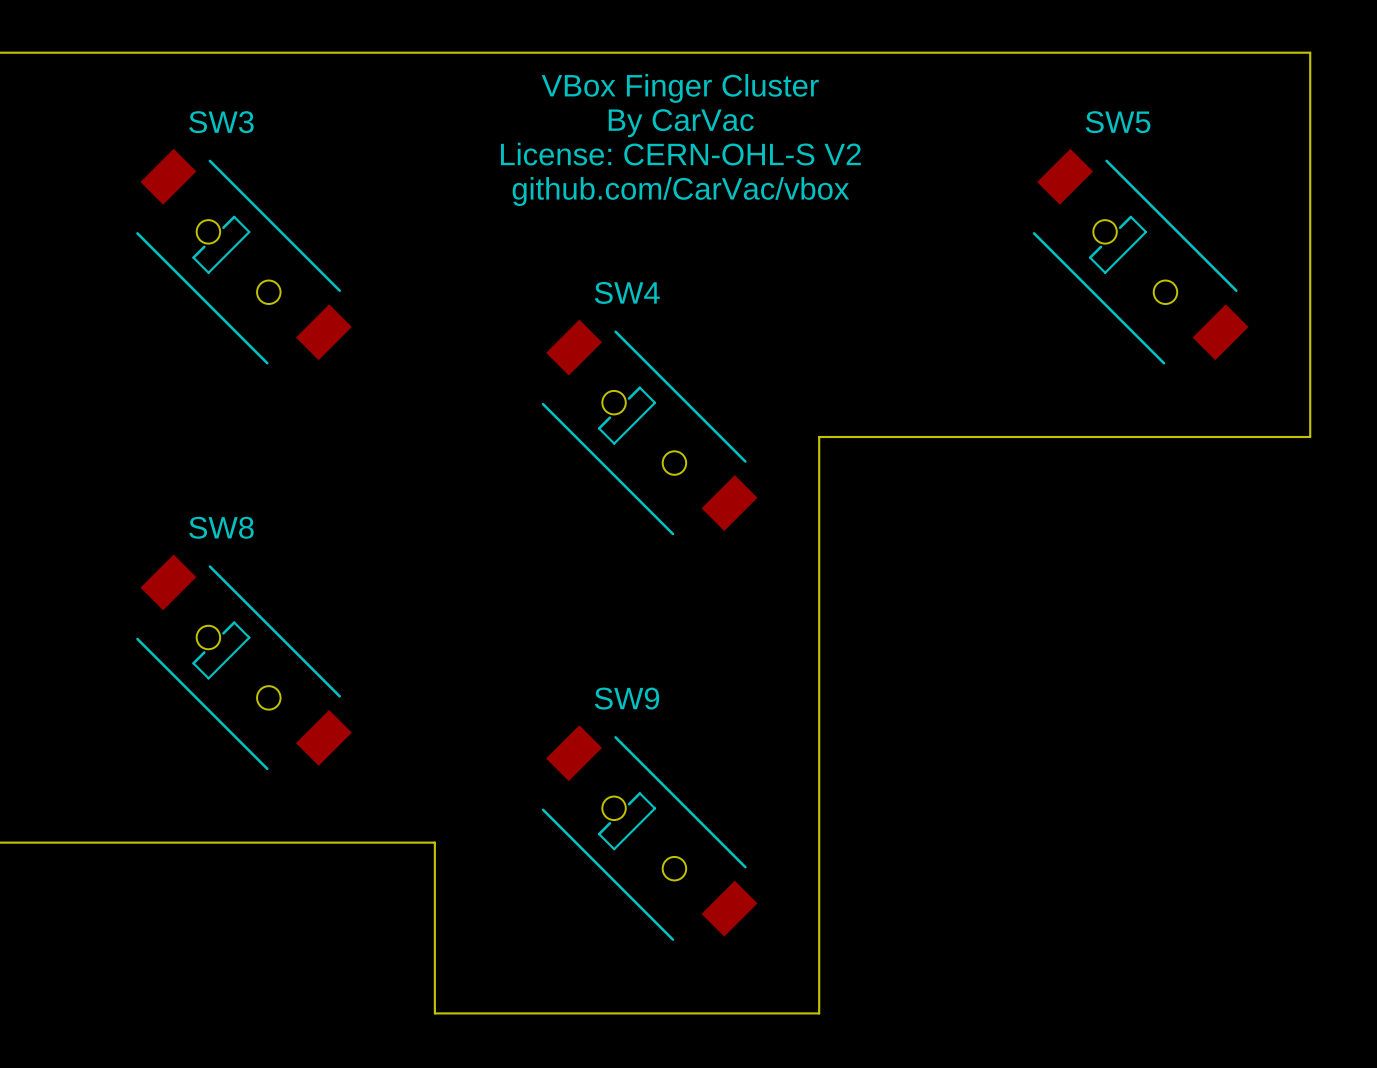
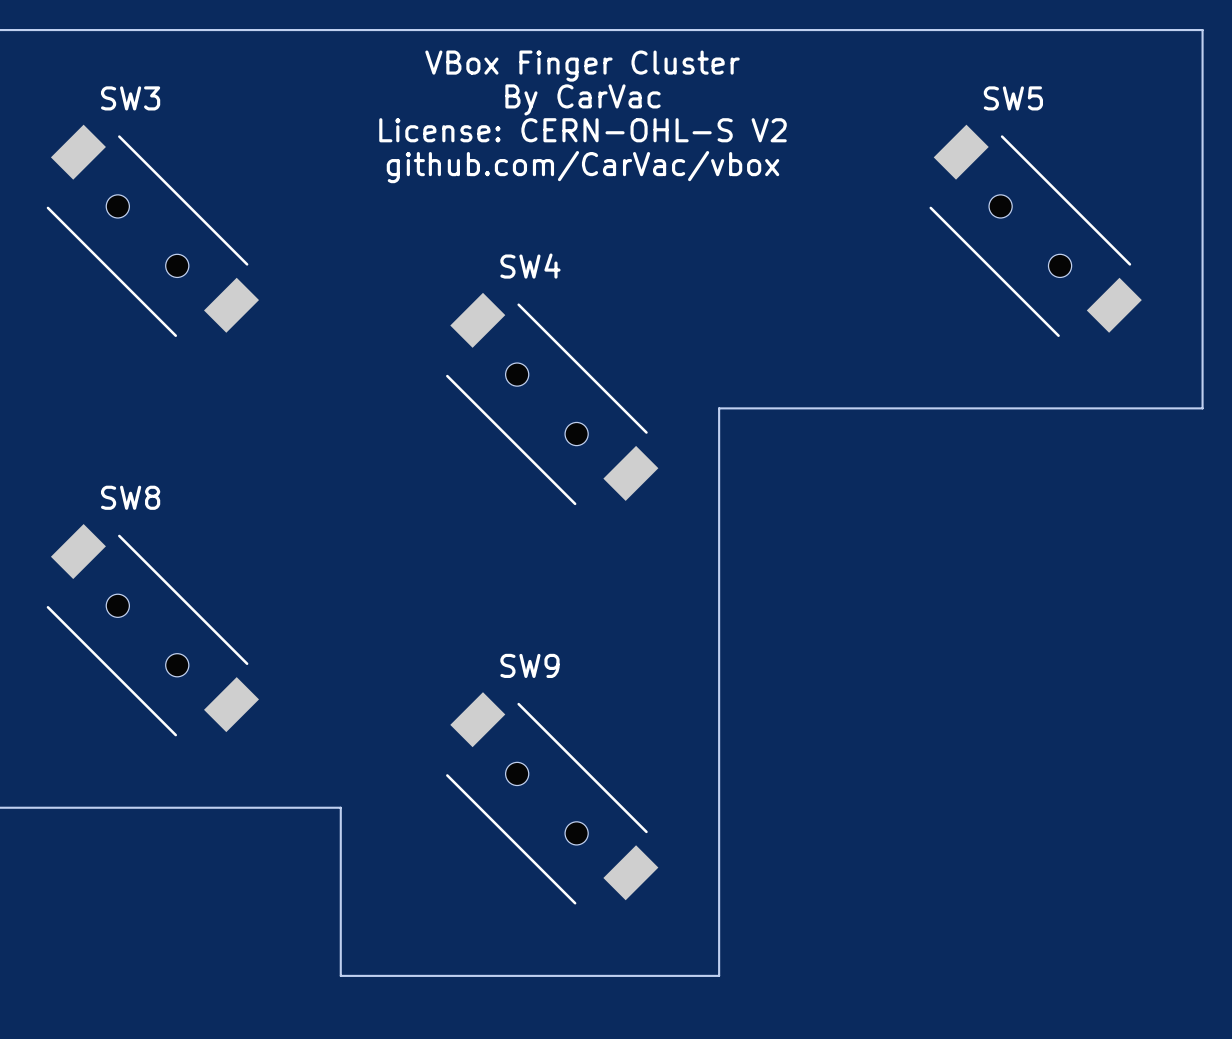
SW3 footprint: [136, 148, 352, 365] -> [46, 124, 260, 338]
SW5 footprint: [1032, 148, 1249, 365] -> [929, 124, 1142, 338]
SW4 footprint: [541, 319, 758, 536] -> [446, 292, 659, 506]
SW8 footprint: [136, 554, 352, 771] -> [46, 524, 260, 737]
SW9 footprint: [541, 725, 758, 941] -> [446, 692, 659, 905]

